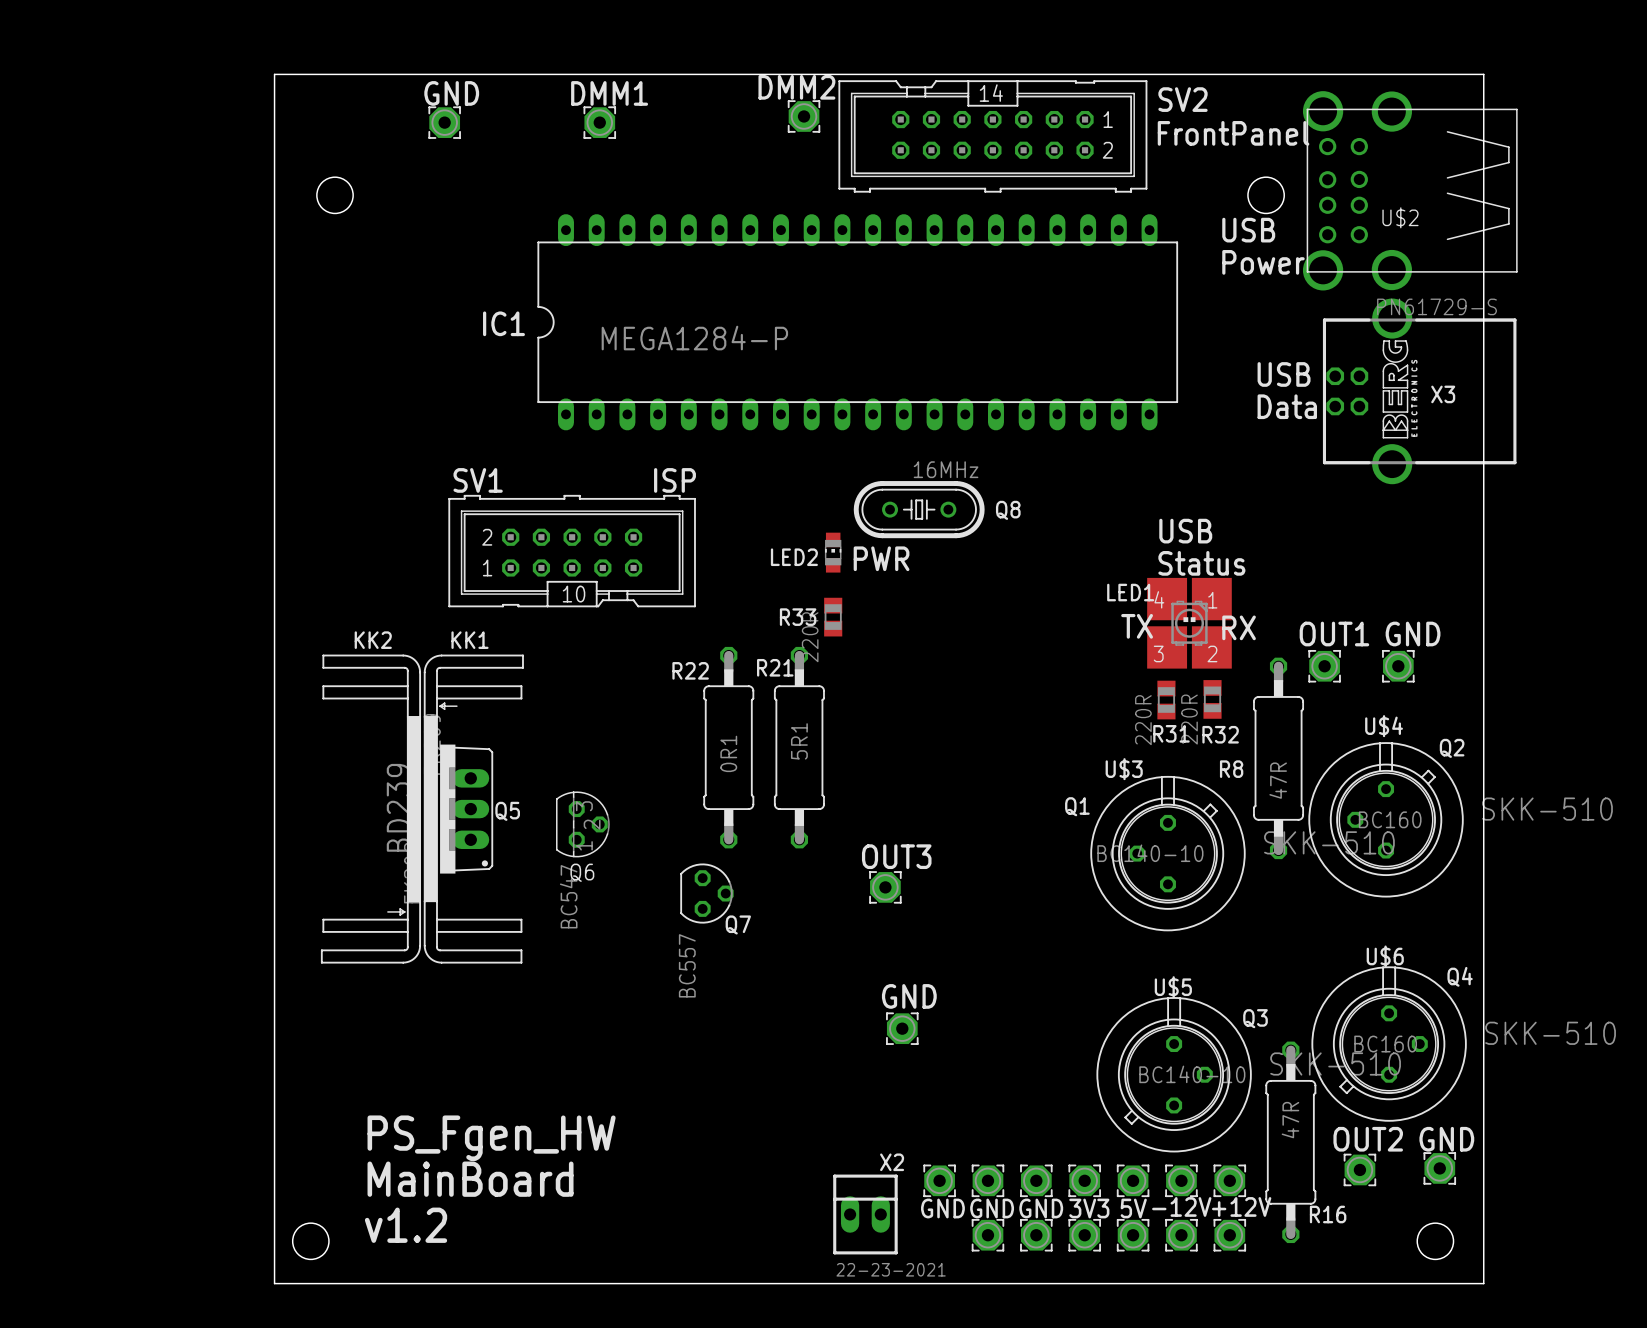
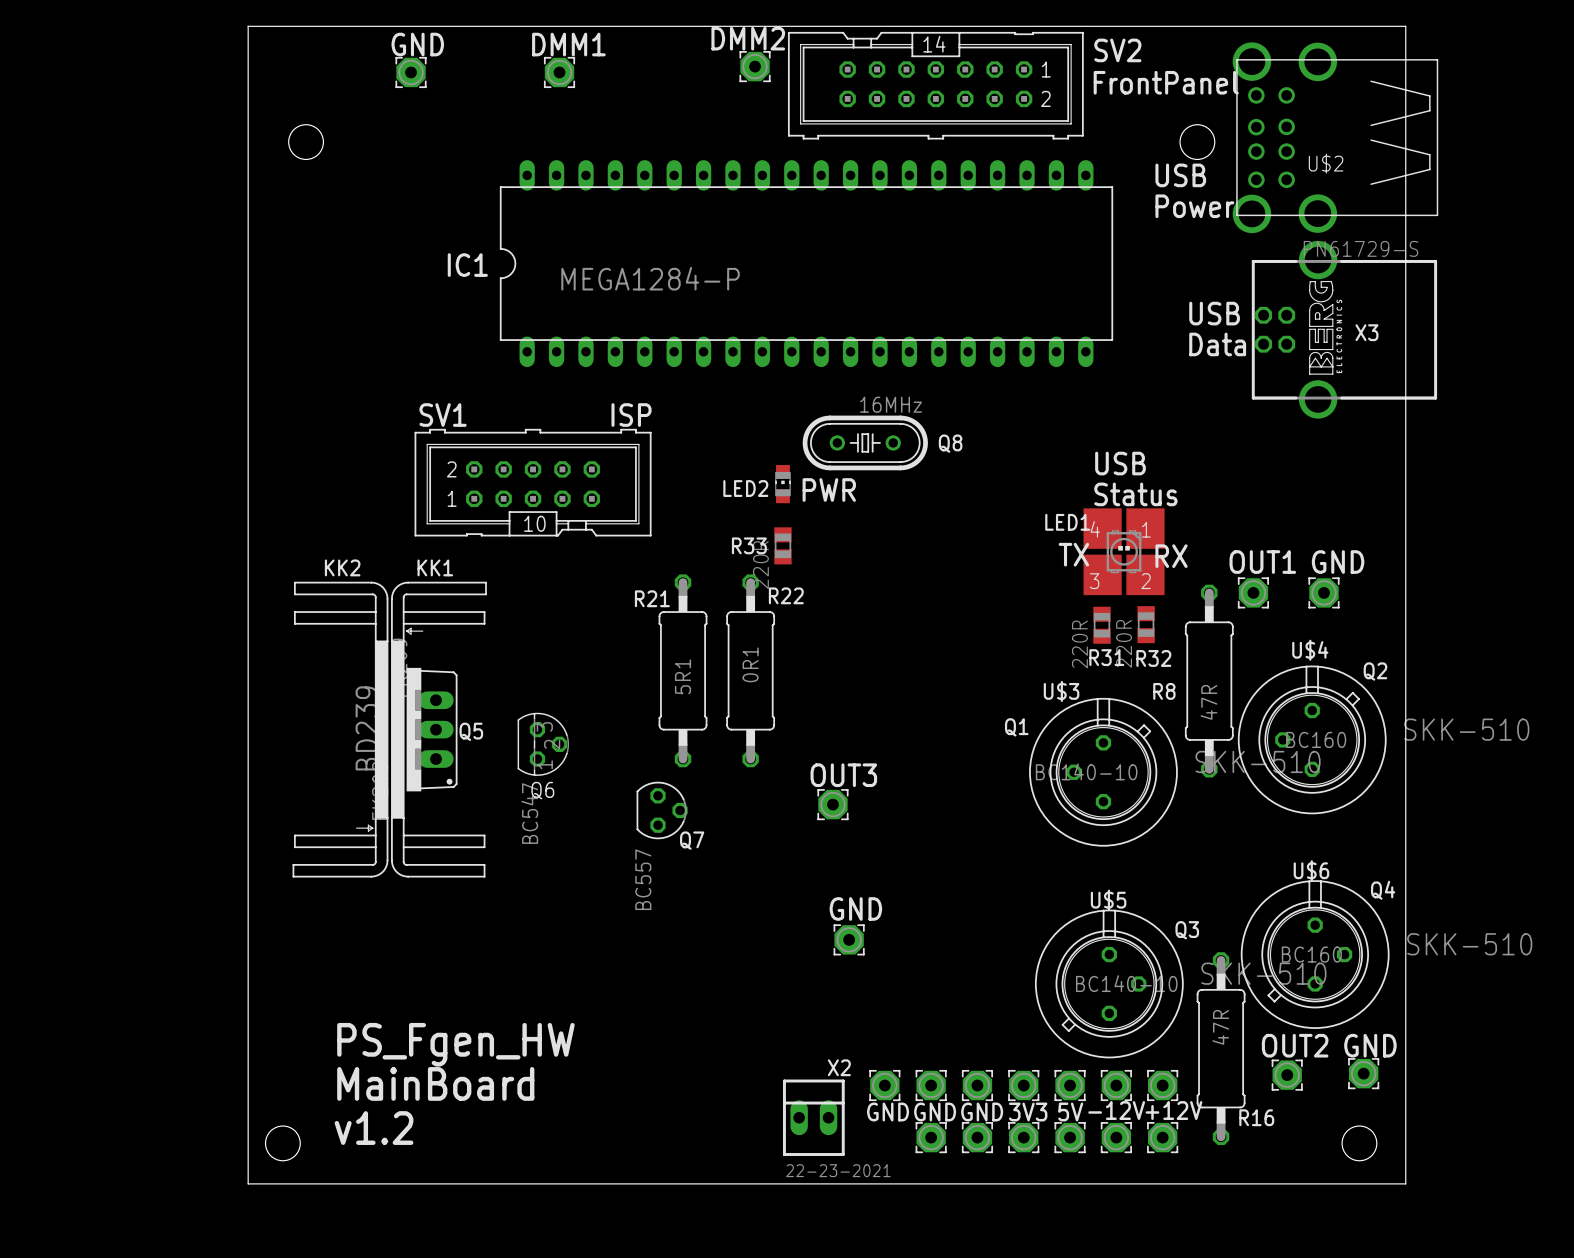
R21 name: R21 (775, 667) -> R22 (786, 595)
R22 name: R22 (690, 670) -> R21 (652, 598)
R21 value: 5R1 (799, 741) -> 0R1 (750, 664)
R22 value: 0R1 (728, 753) -> 5R1 (683, 676)

